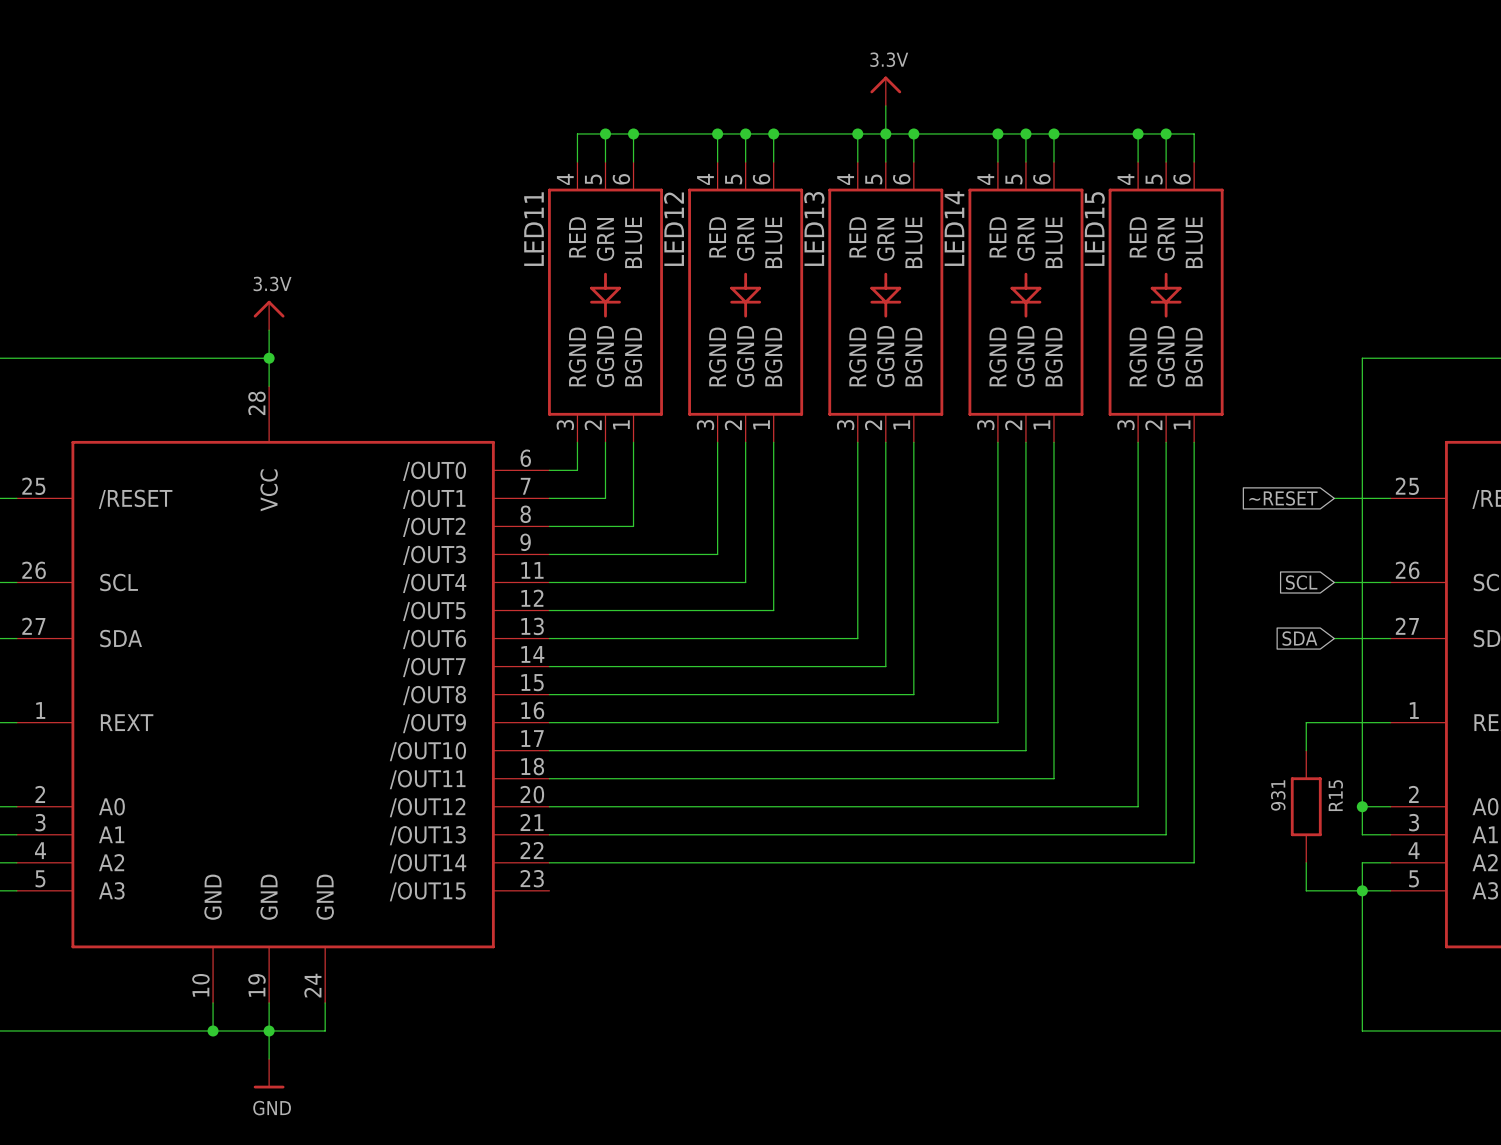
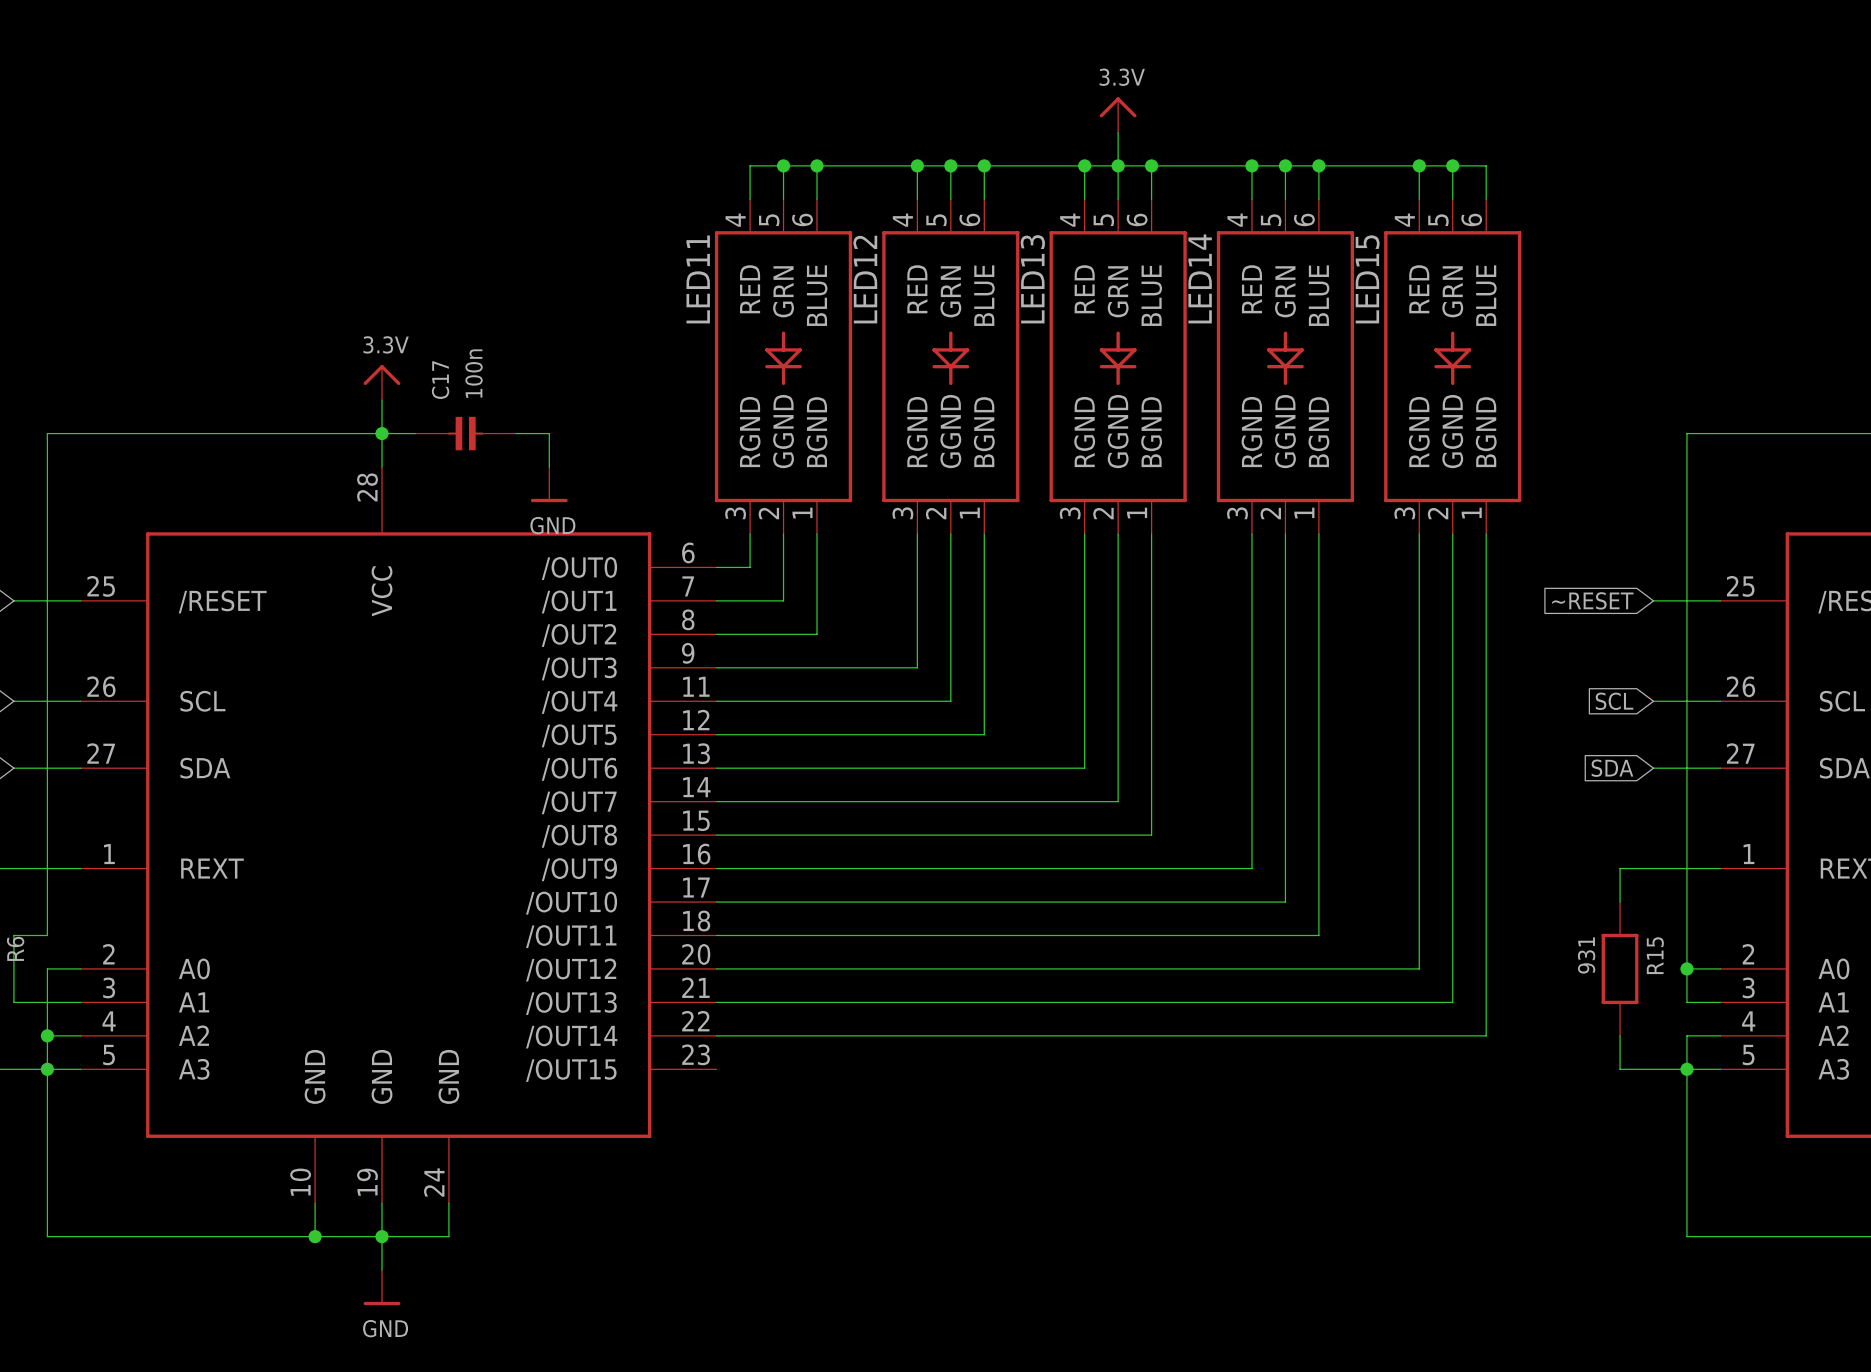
wire: none -> (382, 433) (415, 433)
C17: none -> 100n (465, 433)
wire: none -> (515, 433) (549, 433) (549, 467)
power symbol: none -> GND (549, 484)

